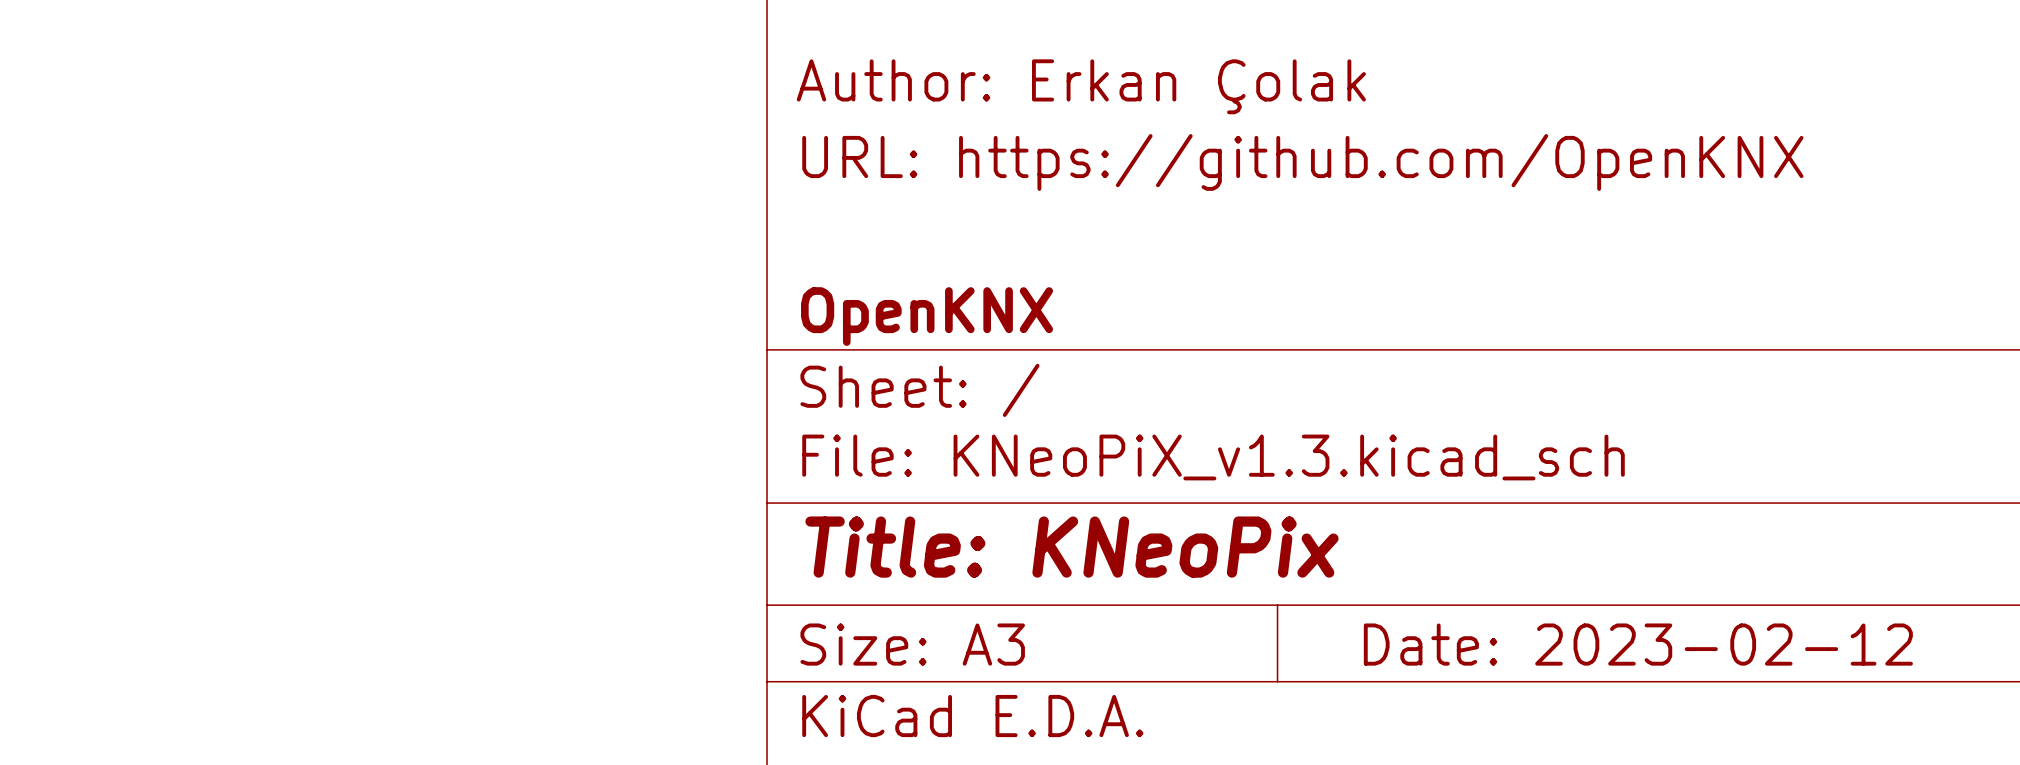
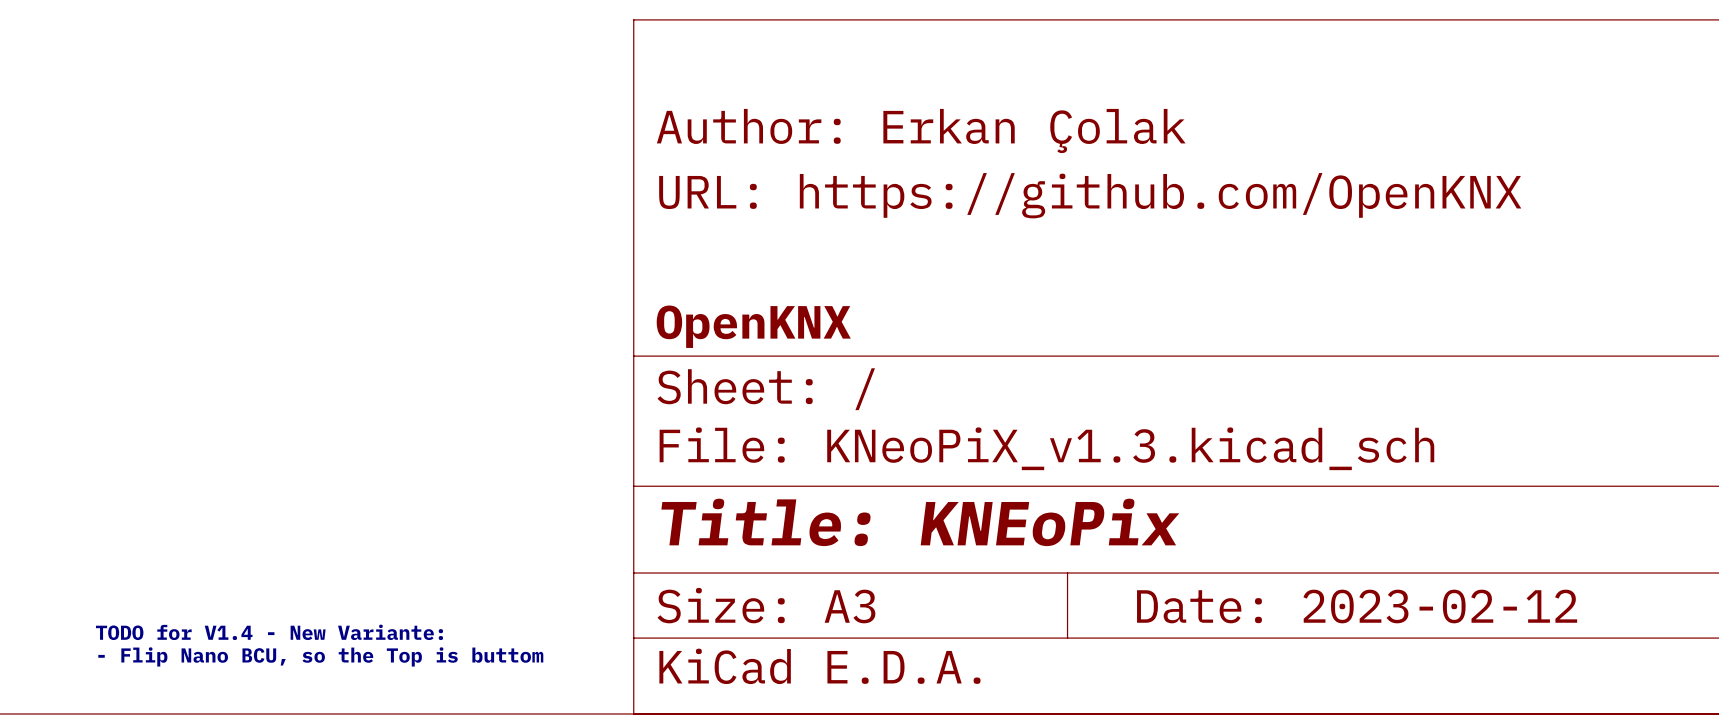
title block: Title: KNeoPix (1071, 547) -> Title: KNEoPix (920, 522)
text: none -> TODO for V1.4 - New Variante: (269, 632)
text: none -> - Flip Nano BCU, so the Top is buttom (320, 656)

